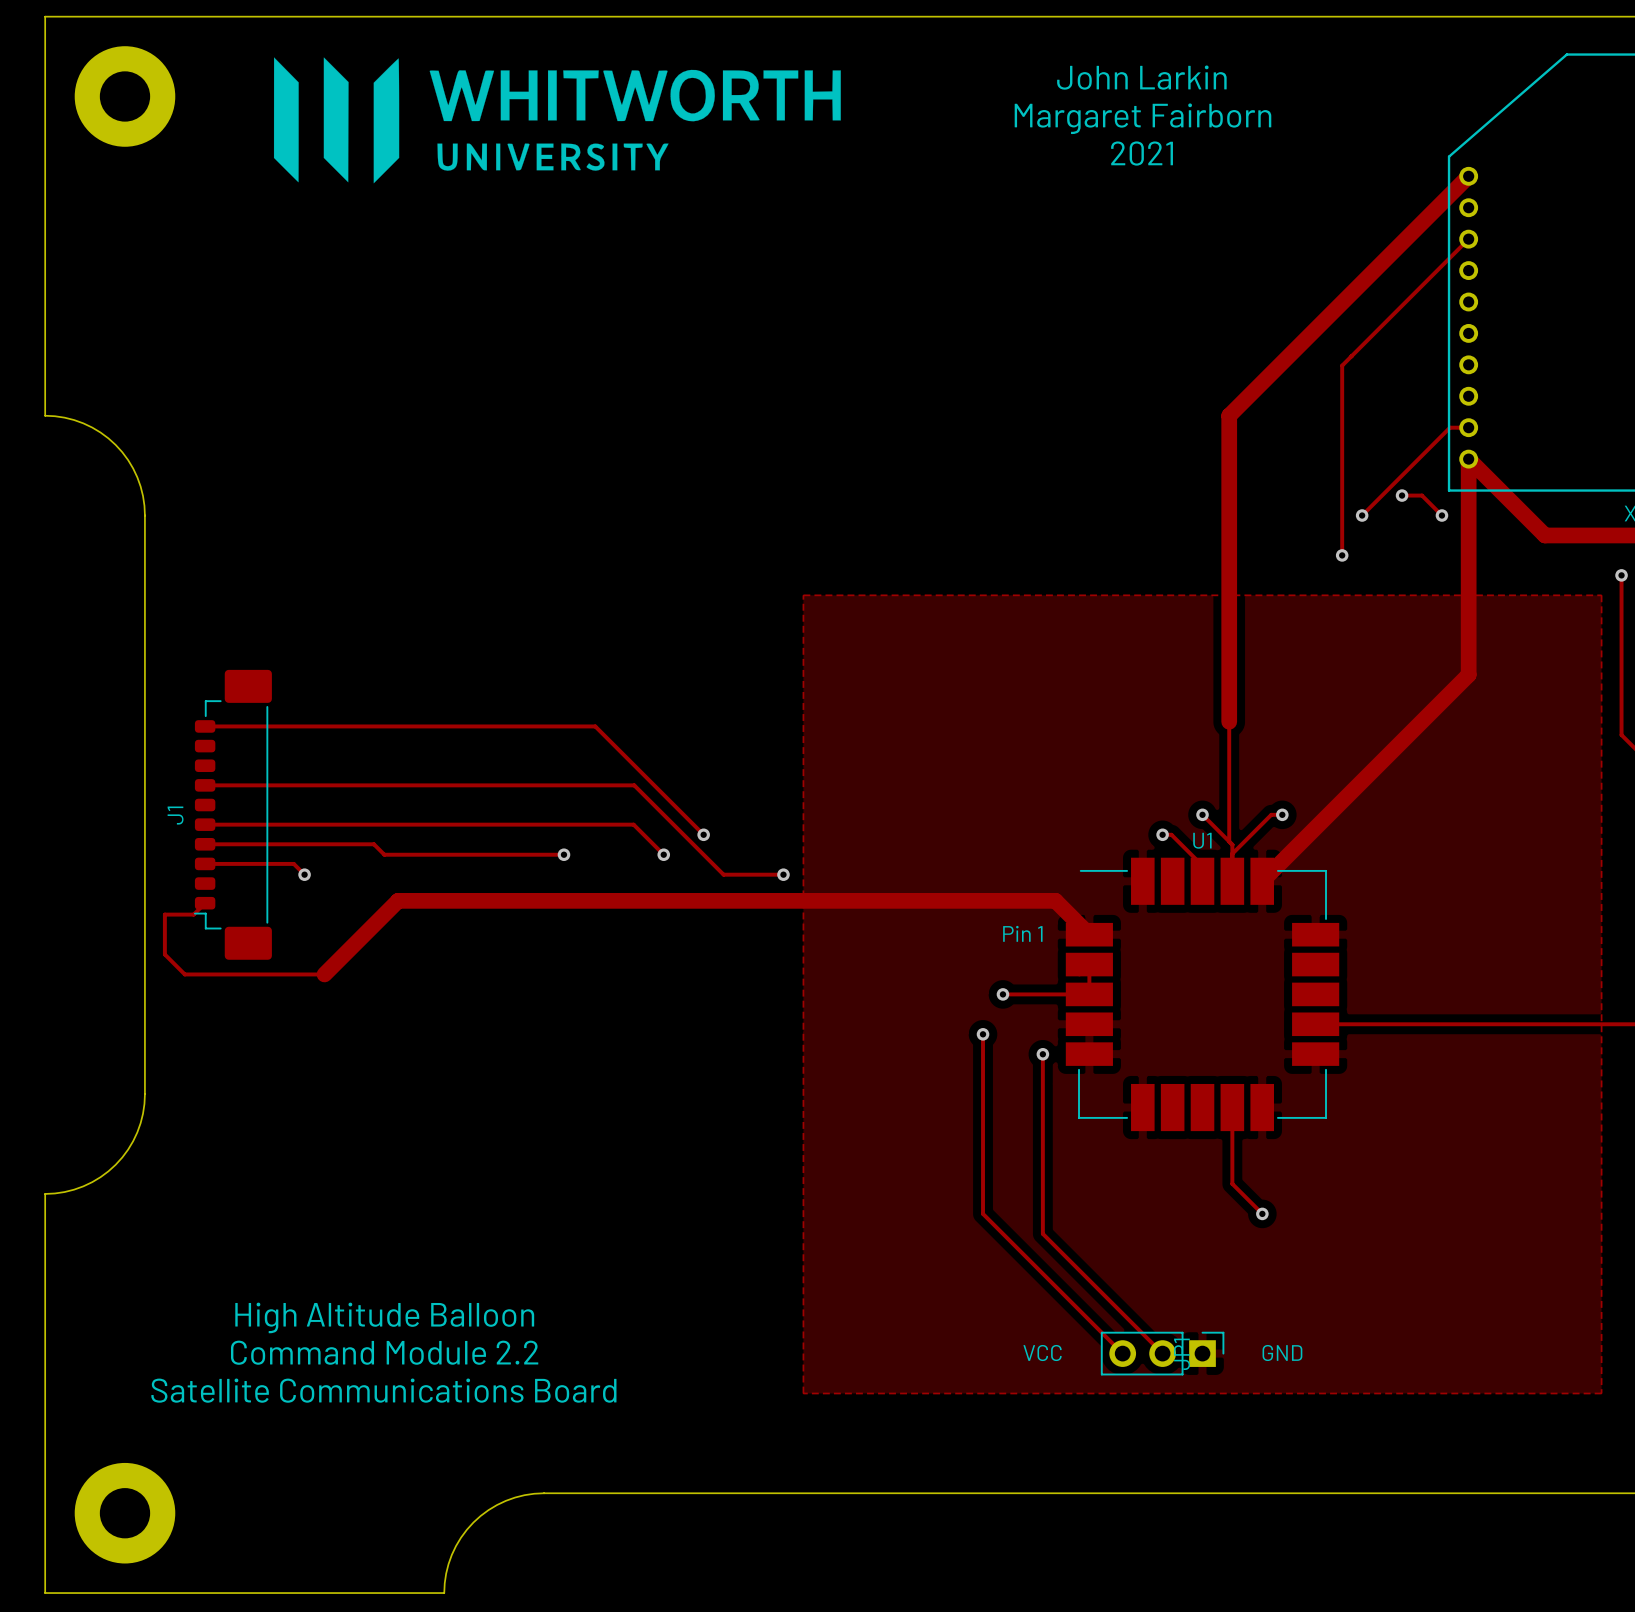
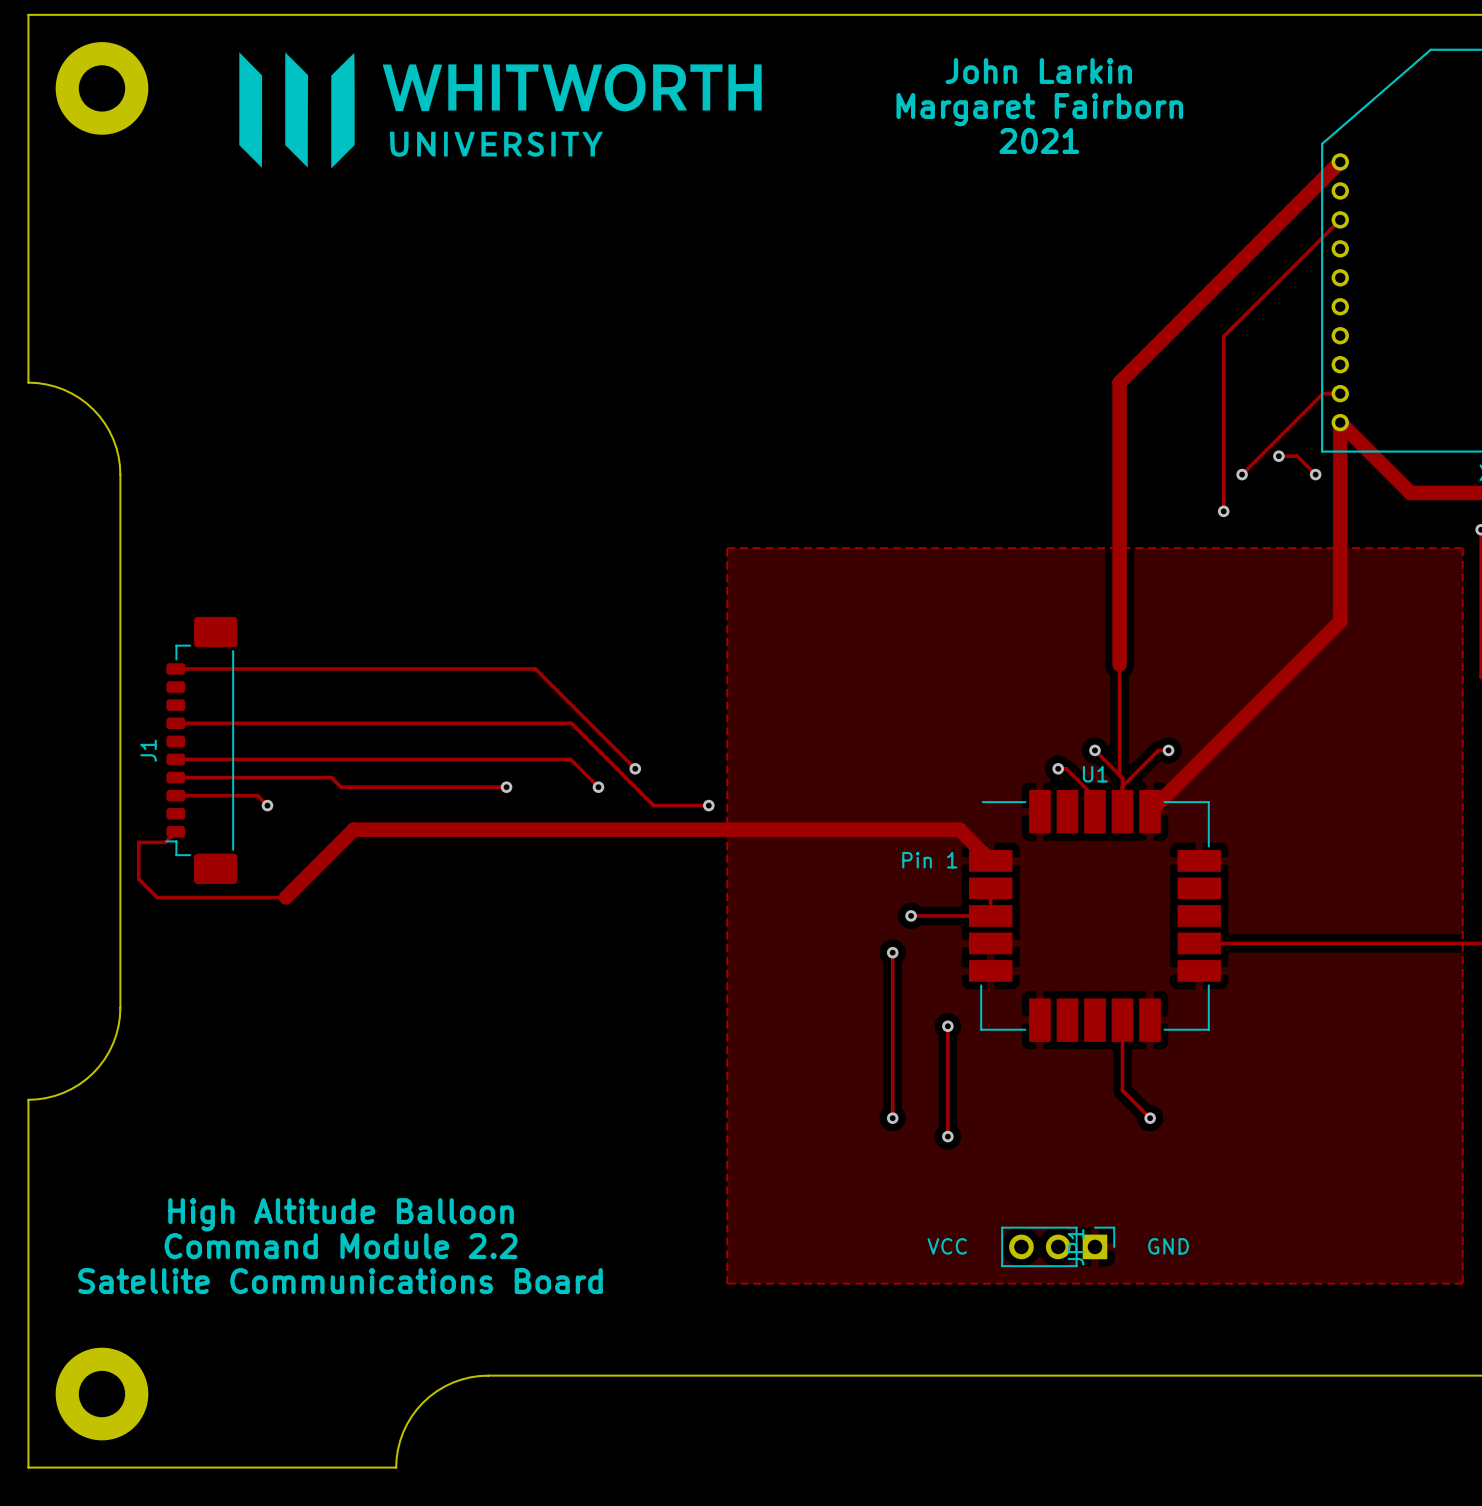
track: (1042, 1054) (1042, 1114) -> none
via position: (1042, 1054) -> (947, 1026)
track: (983, 1213) (1122, 1353) -> none
via: none -> (892, 1118)
track: (1042, 1233) (1162, 1353) -> none
via: none -> (947, 1136)

